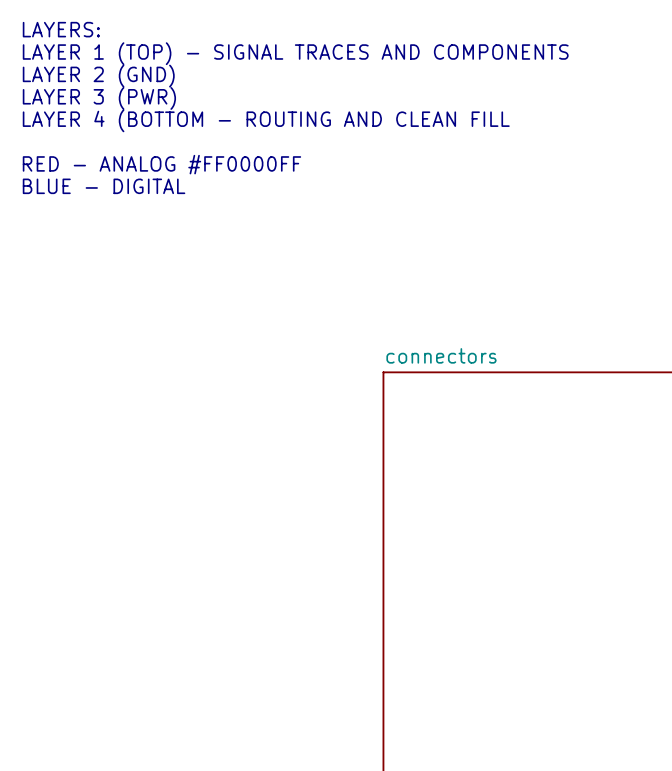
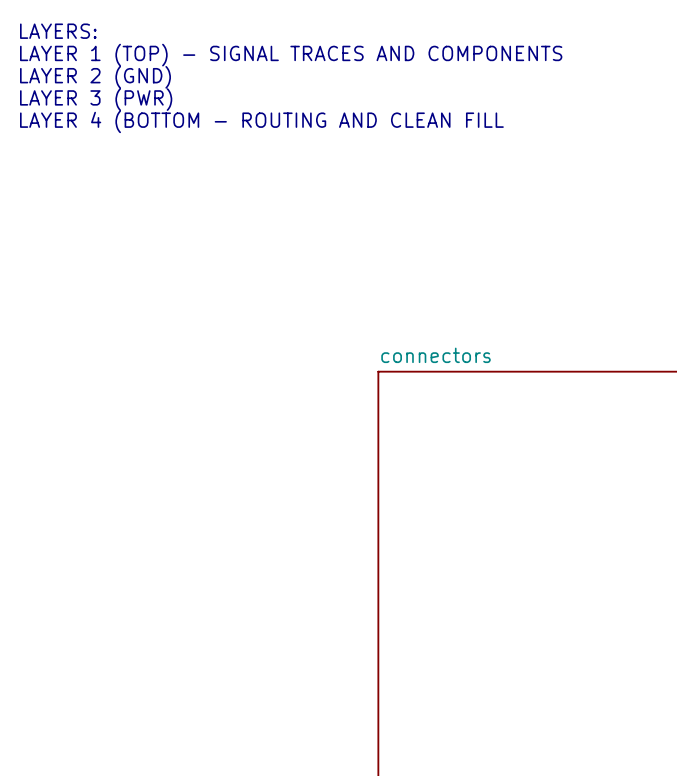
text: RED - ANALOG #FF0000FF (161, 164) -> none
text: BLUE - DIGITAL (104, 186) -> none

